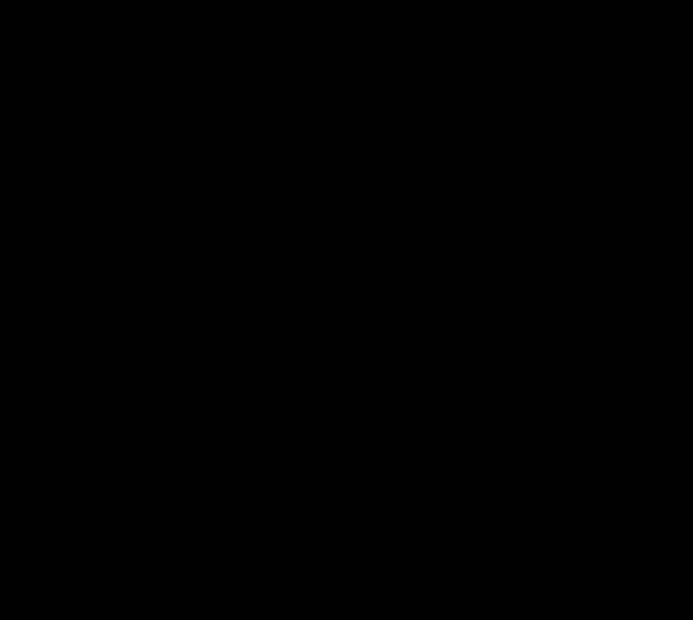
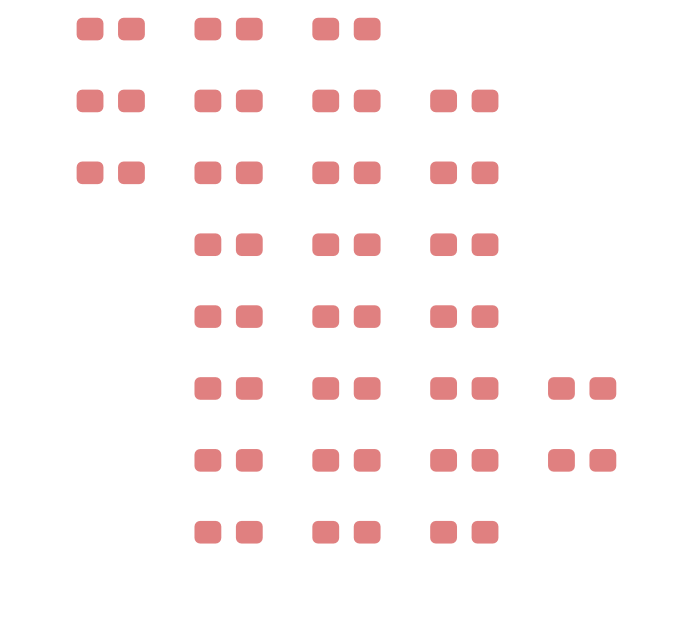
part: none -> (110, 29)
part: none -> (228, 29)
part: none -> (346, 29)
part: none -> (110, 100)
part: none -> (228, 100)
part: none -> (346, 100)
part: none -> (464, 100)
part: none -> (110, 172)
part: none -> (228, 172)
part: none -> (346, 172)
part: none -> (464, 172)
part: none -> (228, 244)
part: none -> (346, 244)
part: none -> (464, 244)
part: none -> (228, 316)
part: none -> (346, 316)
part: none -> (464, 316)
part: none -> (228, 388)
part: none -> (346, 388)
part: none -> (464, 388)
part: none -> (582, 388)
part: none -> (228, 460)
part: none -> (346, 460)
part: none -> (464, 460)
part: none -> (582, 460)
part: none -> (228, 532)
part: none -> (346, 532)
part: none -> (464, 532)

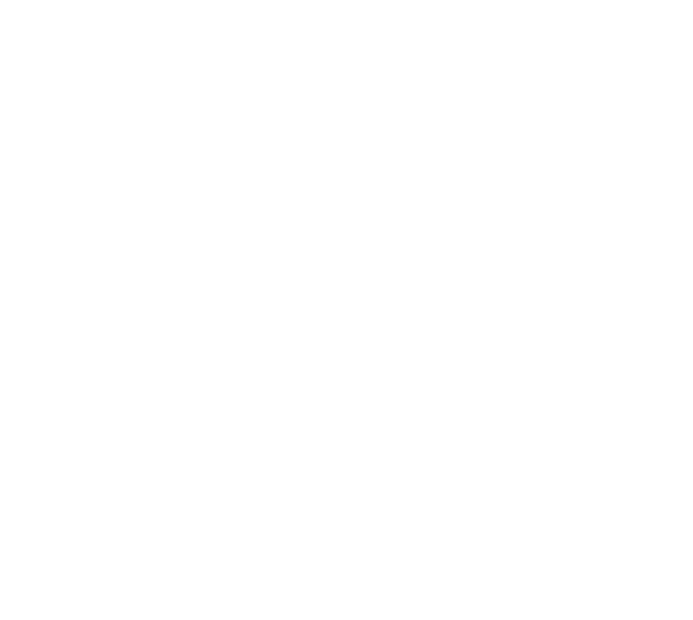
part: (110, 29) -> none
part: (228, 29) -> none
part: (346, 29) -> none
part: (110, 100) -> none
part: (228, 100) -> none
part: (346, 100) -> none
part: (464, 100) -> none
part: (110, 172) -> none
part: (228, 172) -> none
part: (346, 172) -> none
part: (464, 172) -> none
part: (228, 244) -> none
part: (346, 244) -> none
part: (464, 244) -> none
part: (228, 316) -> none
part: (346, 316) -> none
part: (464, 316) -> none
part: (228, 388) -> none
part: (346, 388) -> none
part: (464, 388) -> none
part: (582, 388) -> none
part: (228, 460) -> none
part: (346, 460) -> none
part: (464, 460) -> none
part: (582, 460) -> none
part: (228, 532) -> none
part: (346, 532) -> none
part: (464, 532) -> none

